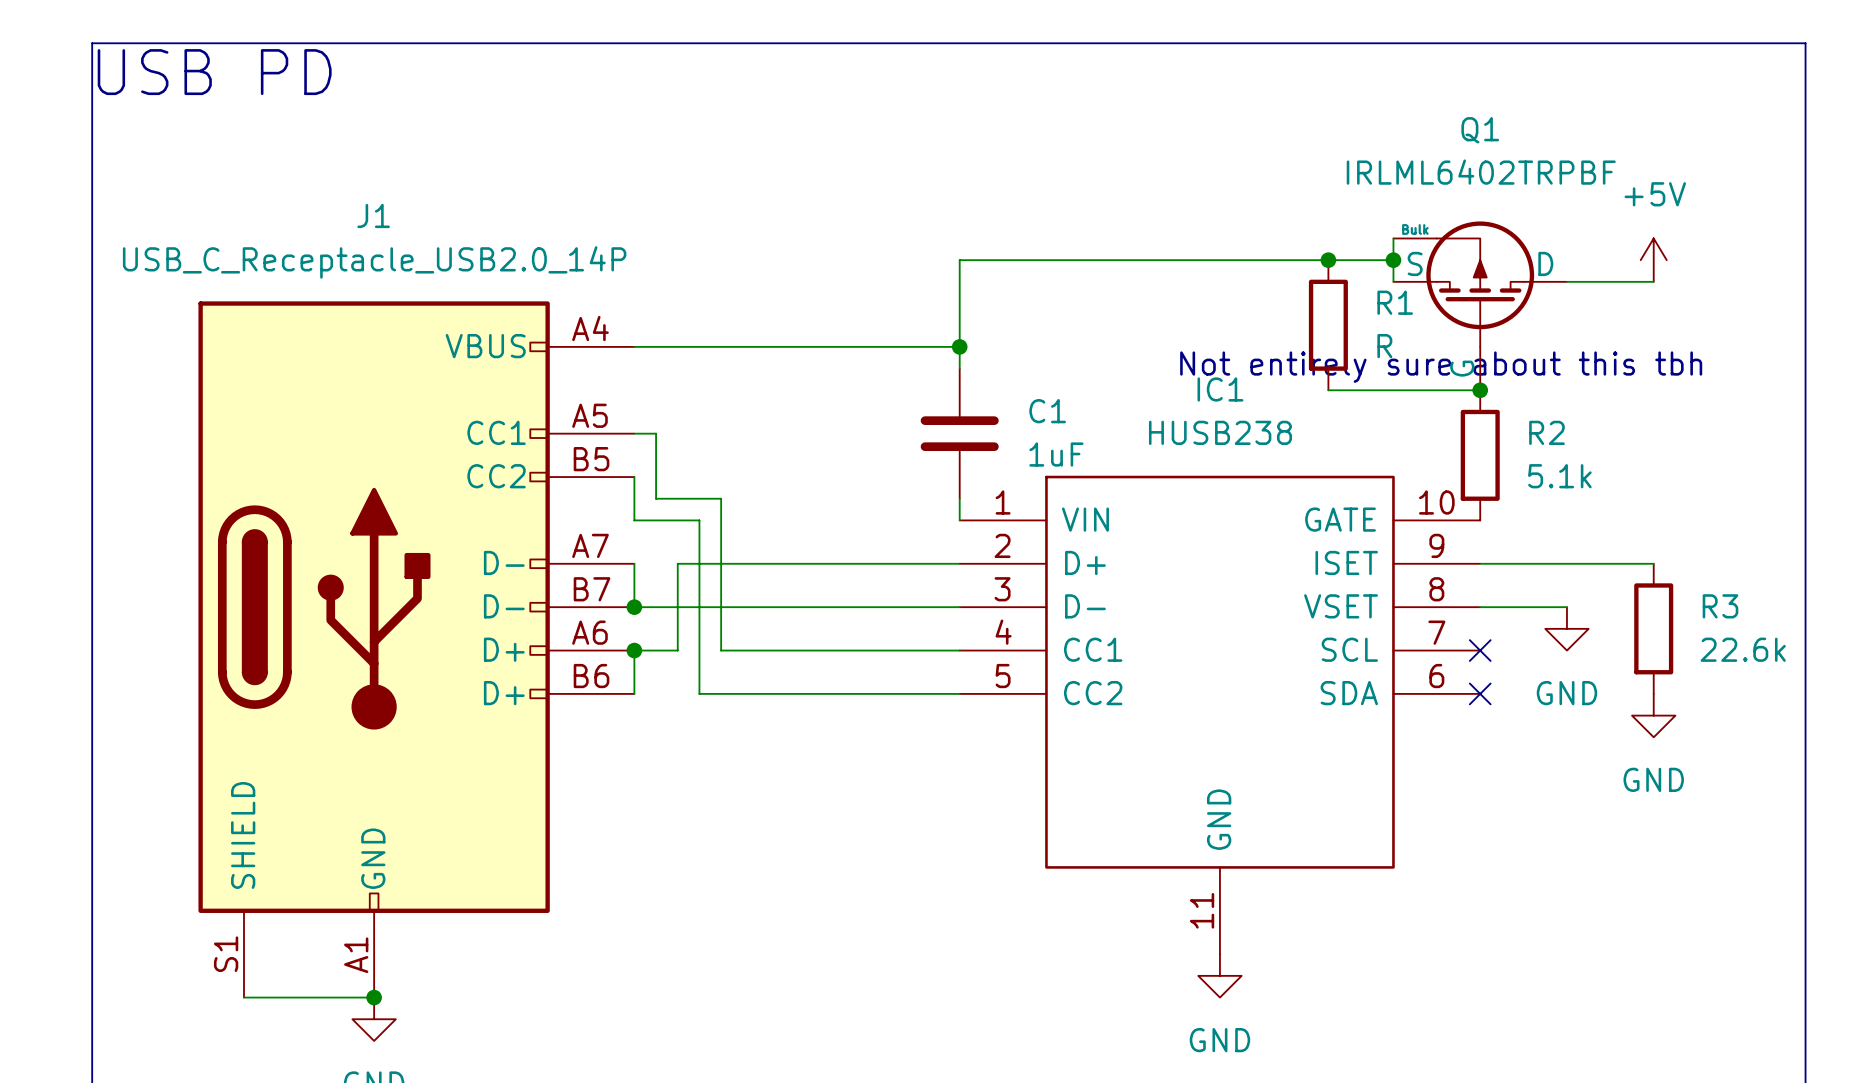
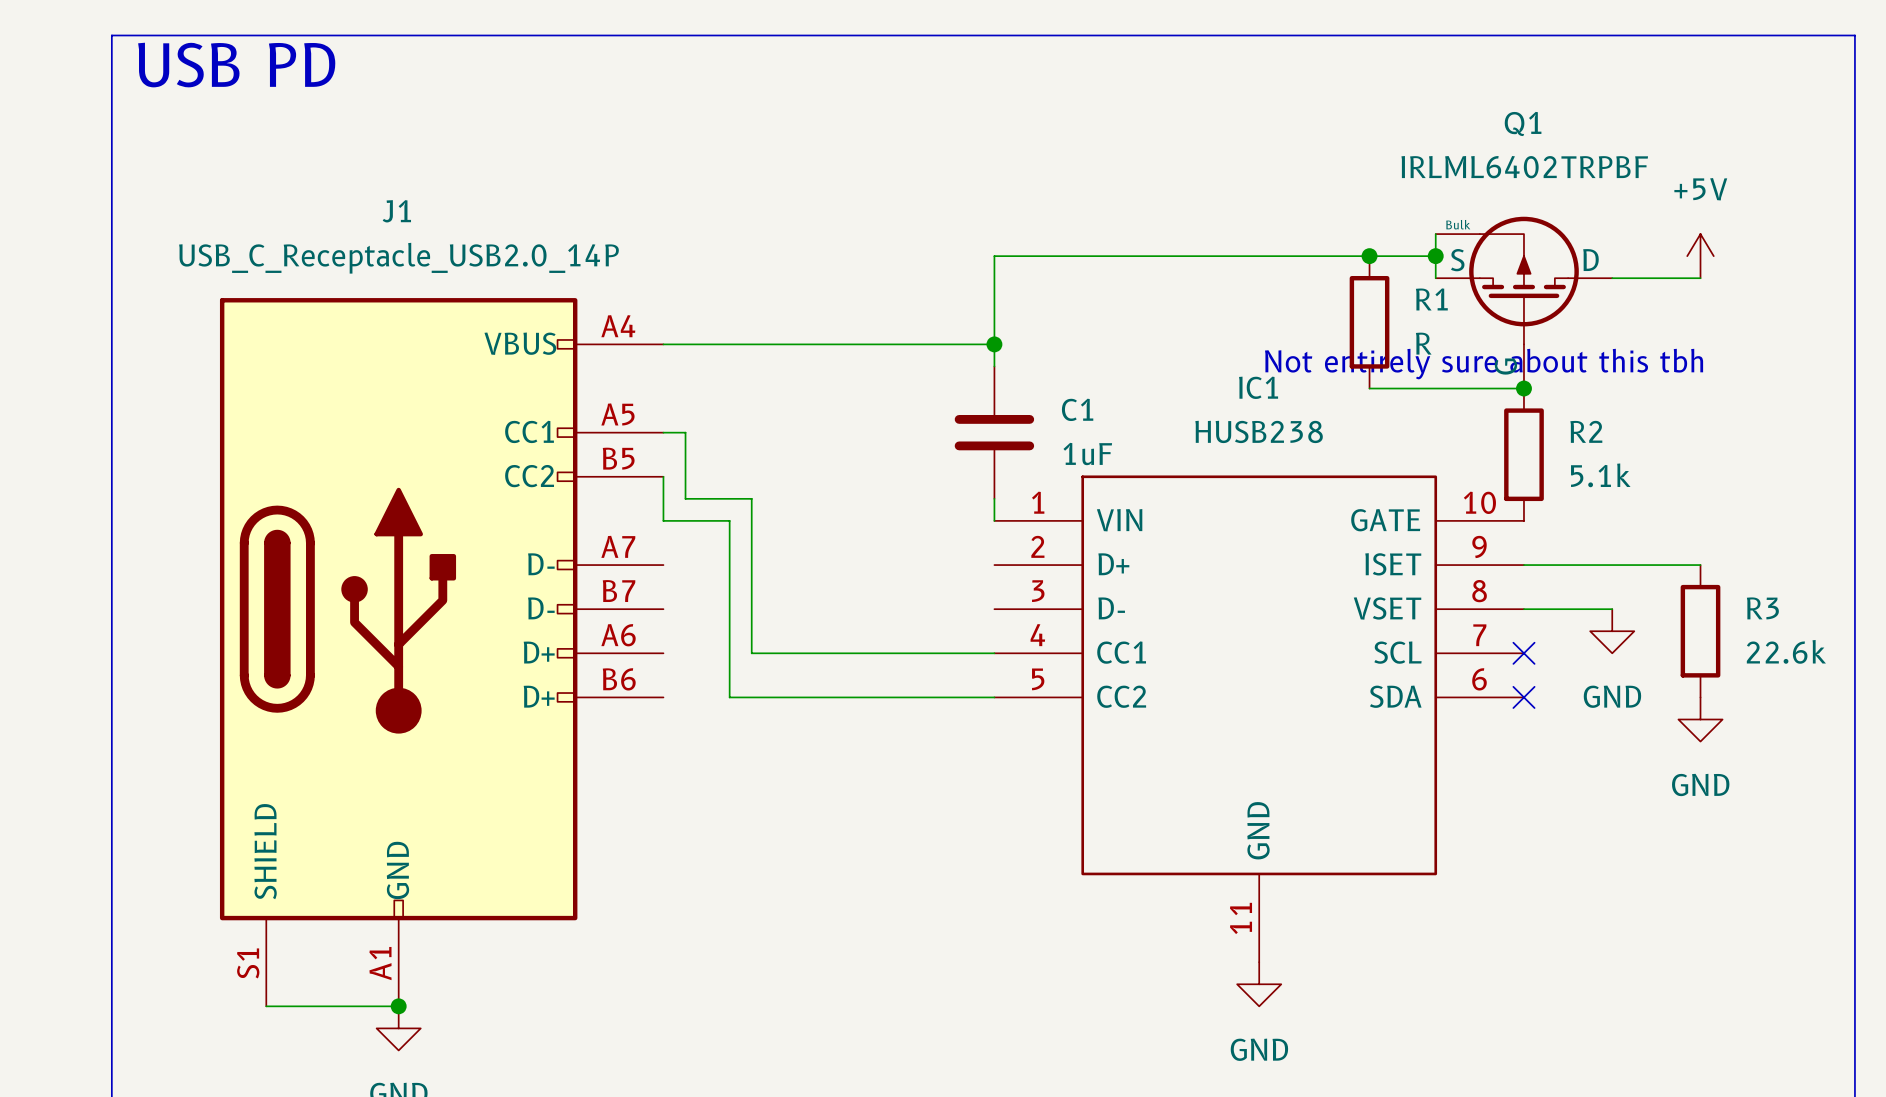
wire: (634, 563) (634, 607) (959, 607) -> none
wire: (959, 563) (677, 563) (677, 650) (634, 650) (634, 693) -> none
junction: (634, 607) -> none
junction: (634, 650) -> none

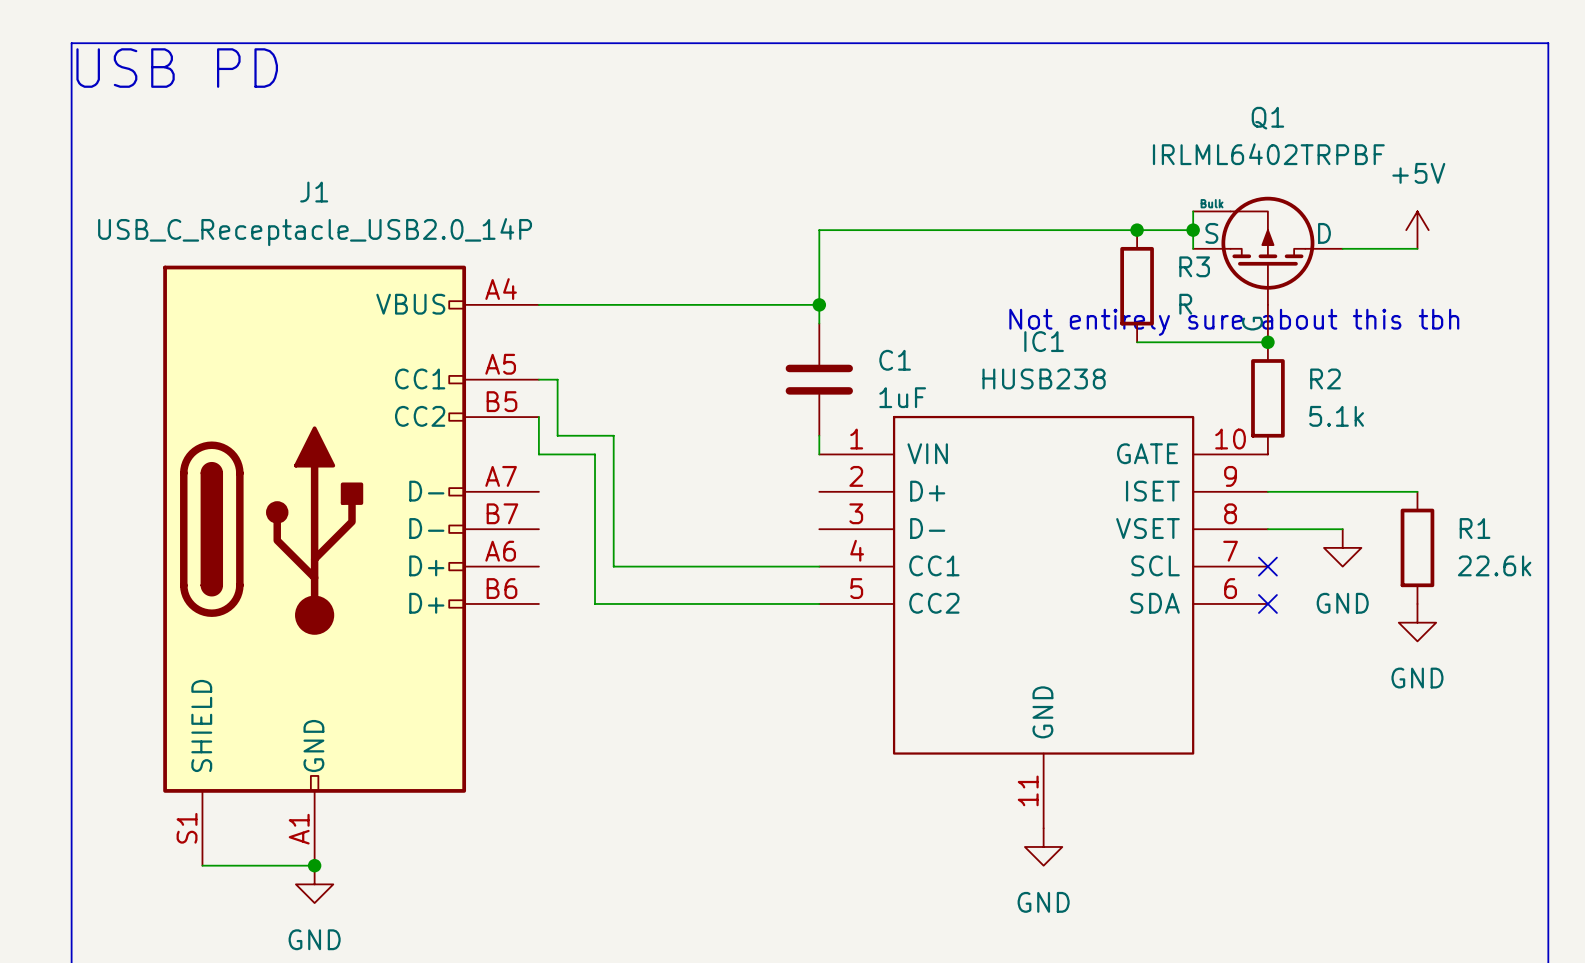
R1 name: R1 (1431, 299) -> R3 (1194, 266)
R3 name: R3 (1762, 608) -> R1 (1475, 528)

